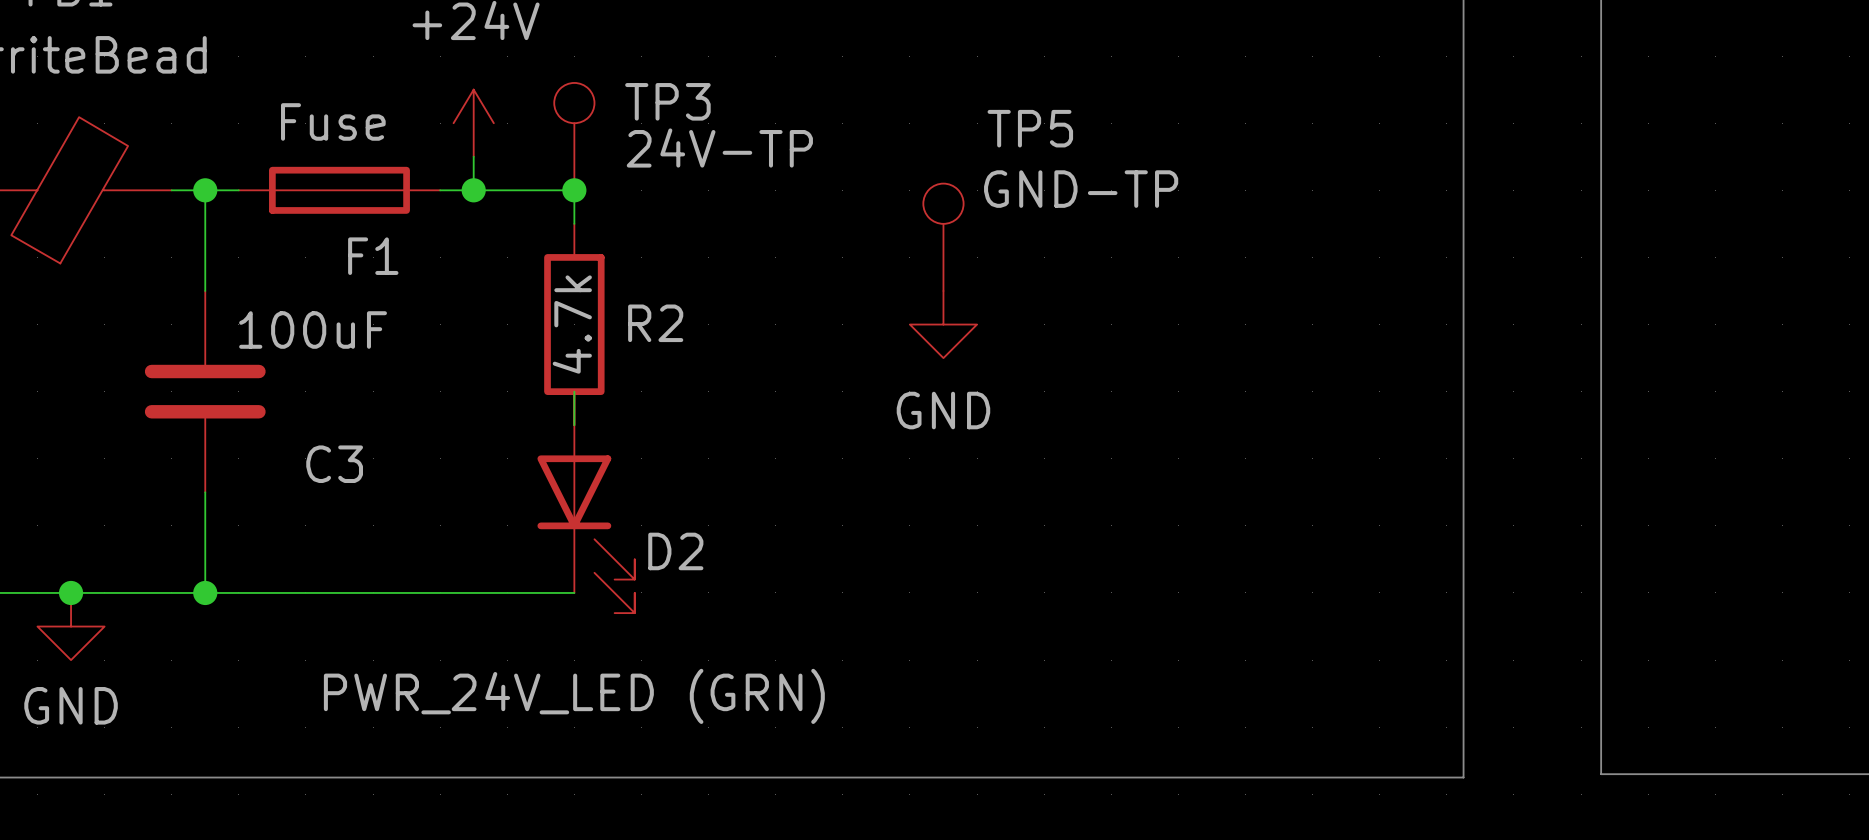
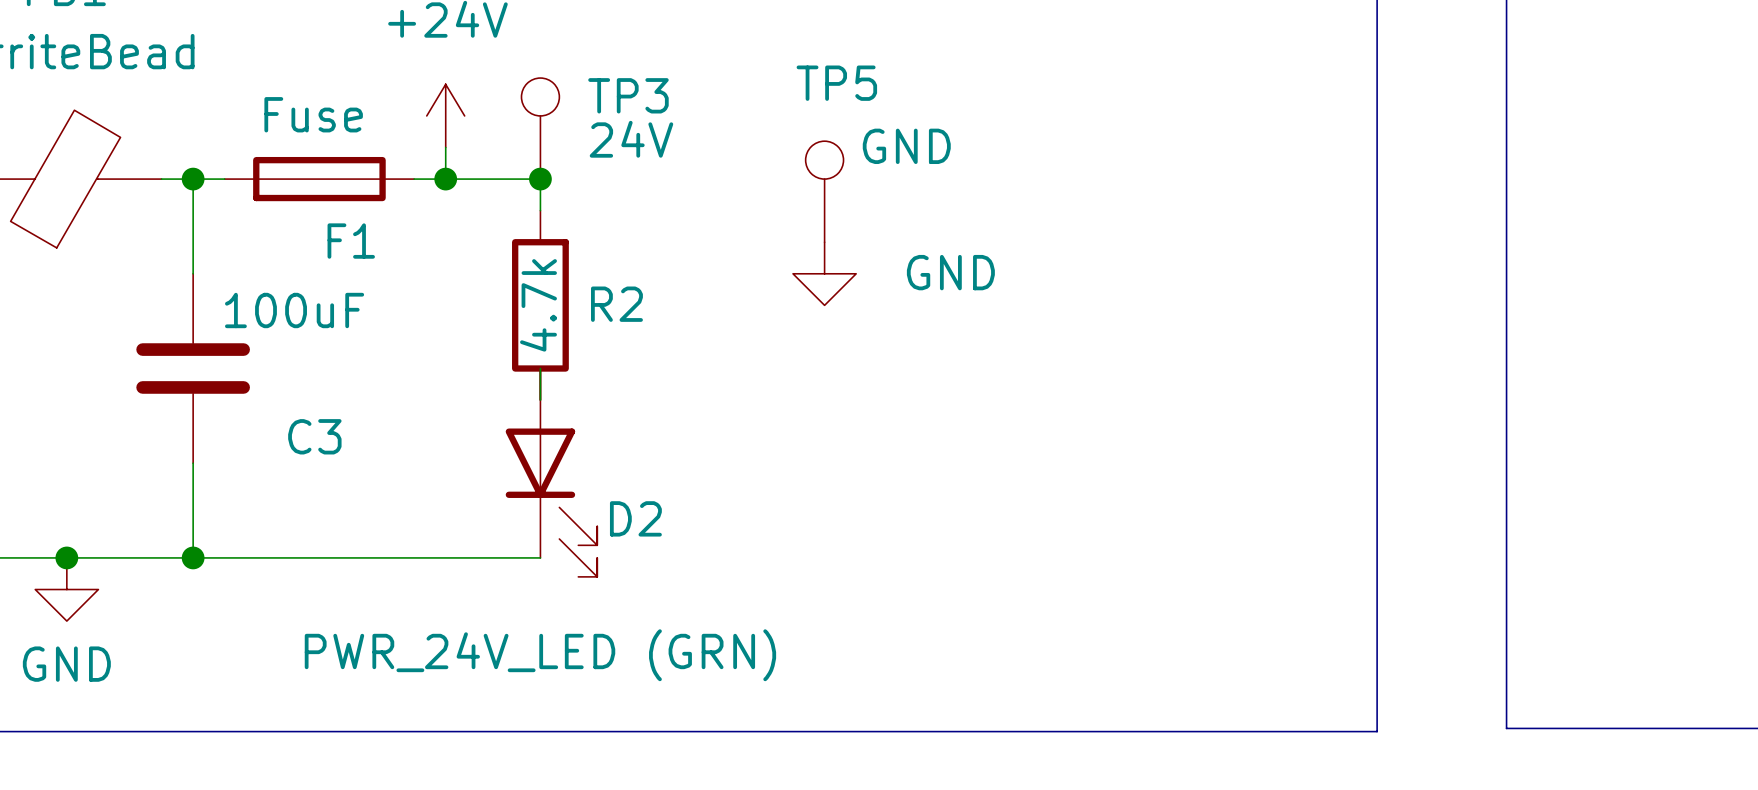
TP5 name position: TP5 (1030, 128) -> TP5 (836, 83)
TP3 value: 24V-TP (719, 148) -> 24V (631, 139)
TP5 value: GND-TP (1081, 189) -> GND (906, 146)
TP5 position: (943, 237) -> (824, 191)
power symbol position: GND (943, 324) -> GND (824, 273)
power symbol text position: GND (943, 410) -> GND (950, 272)

